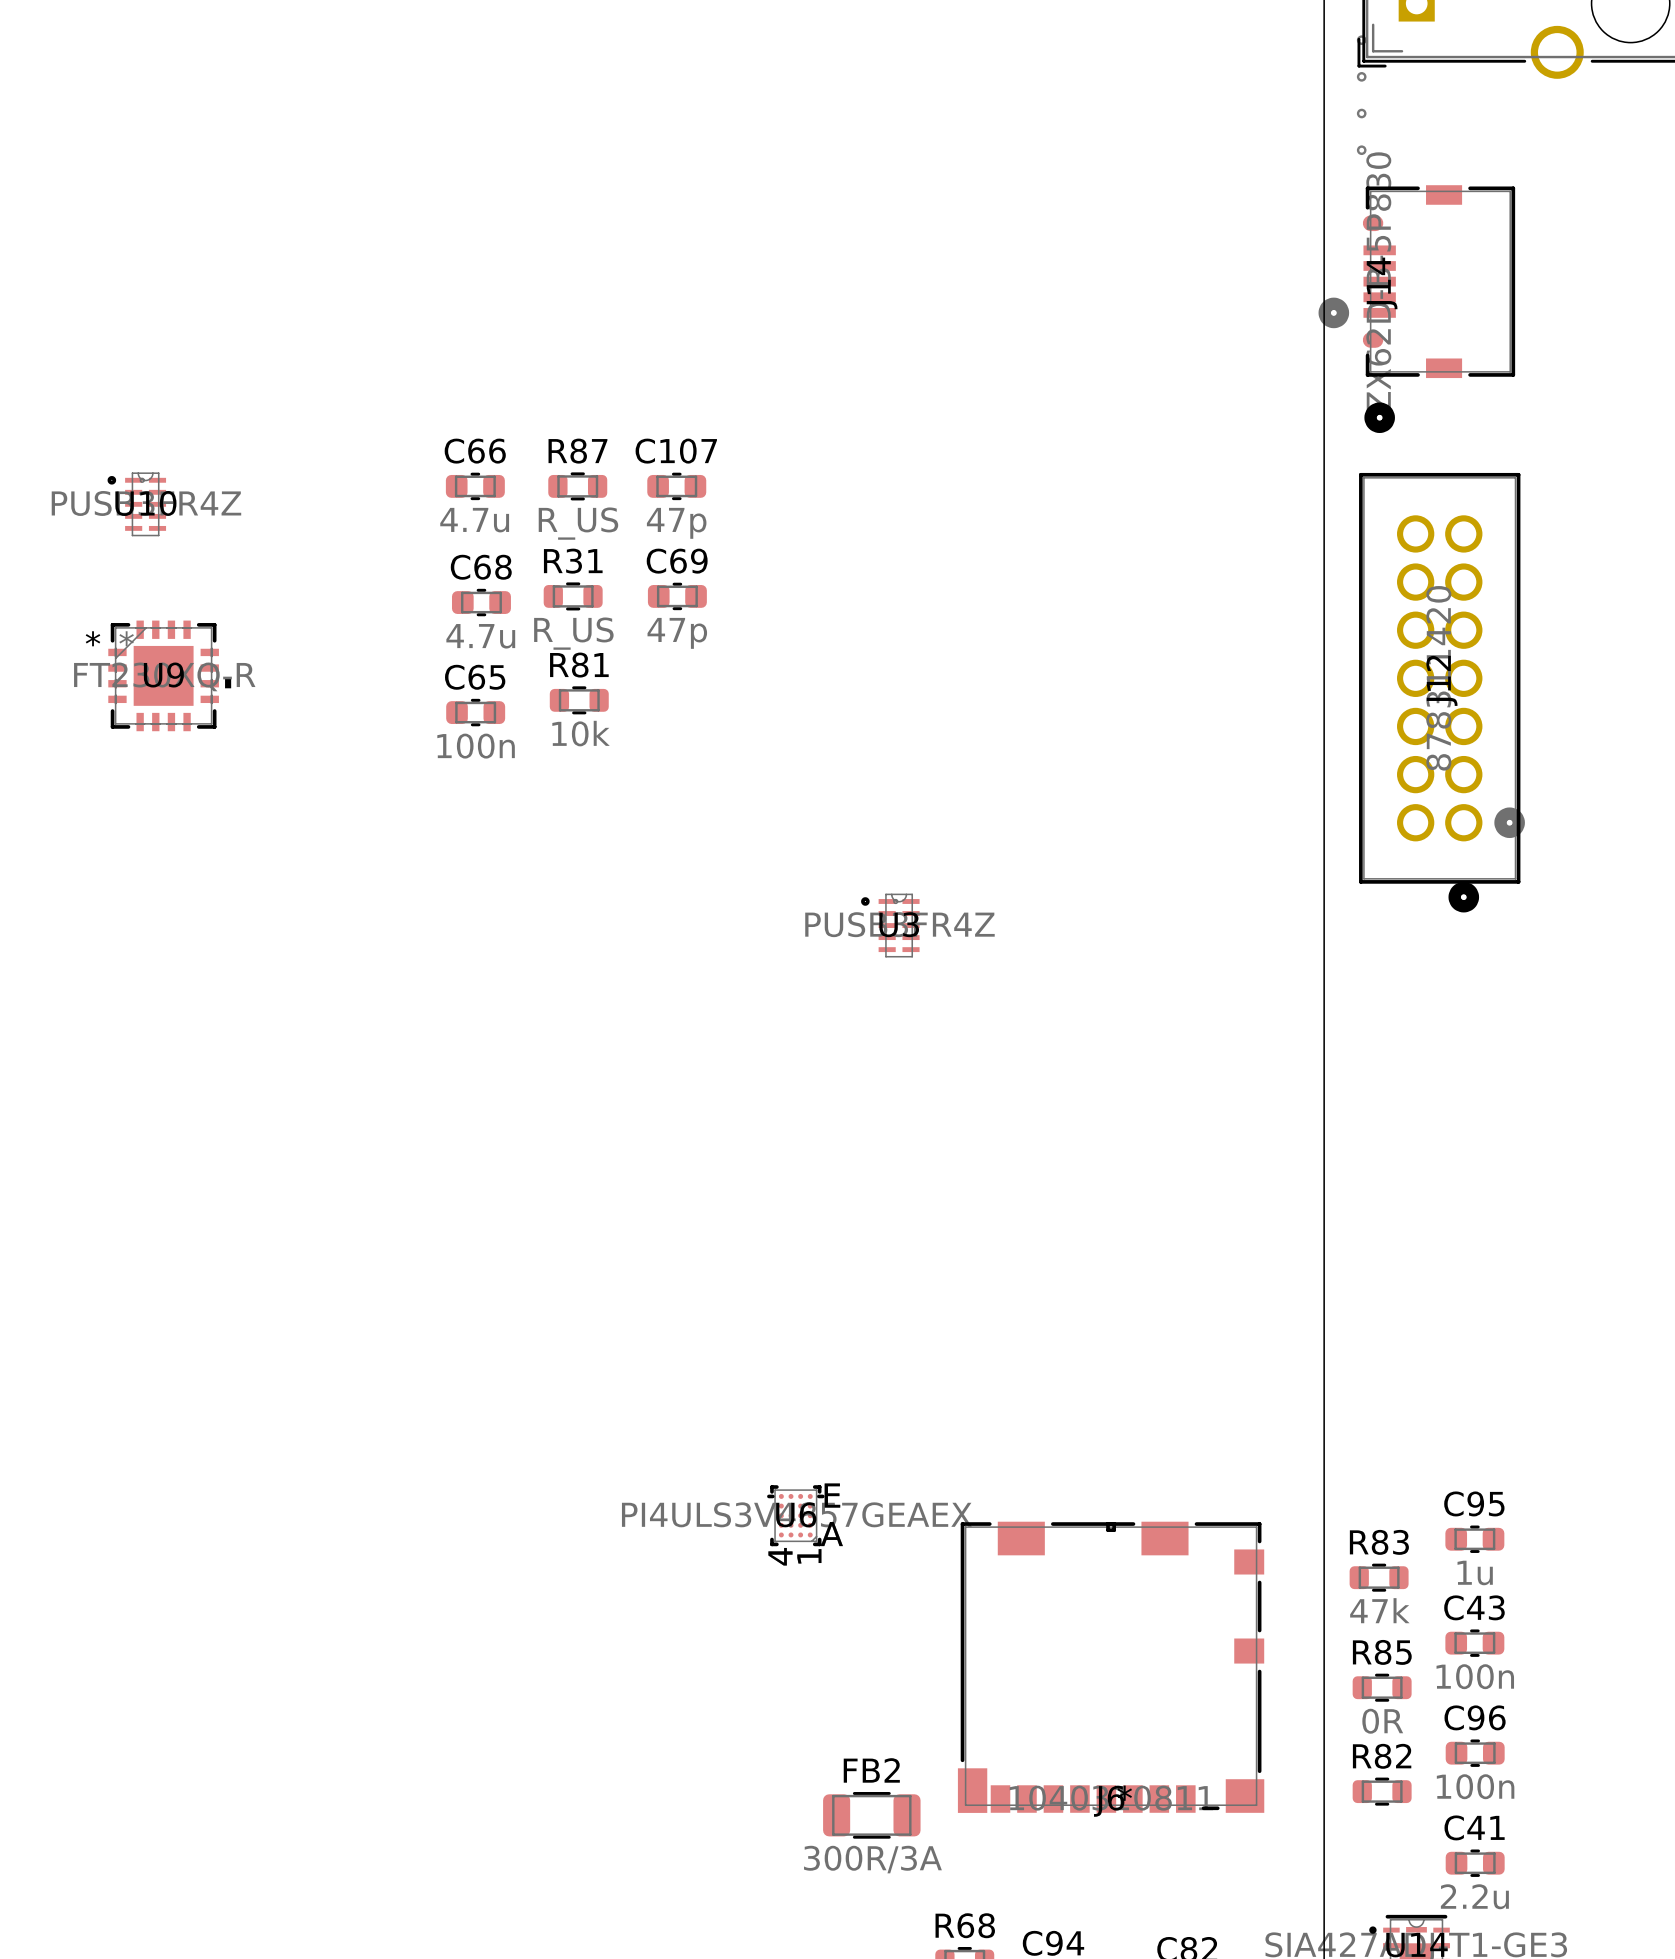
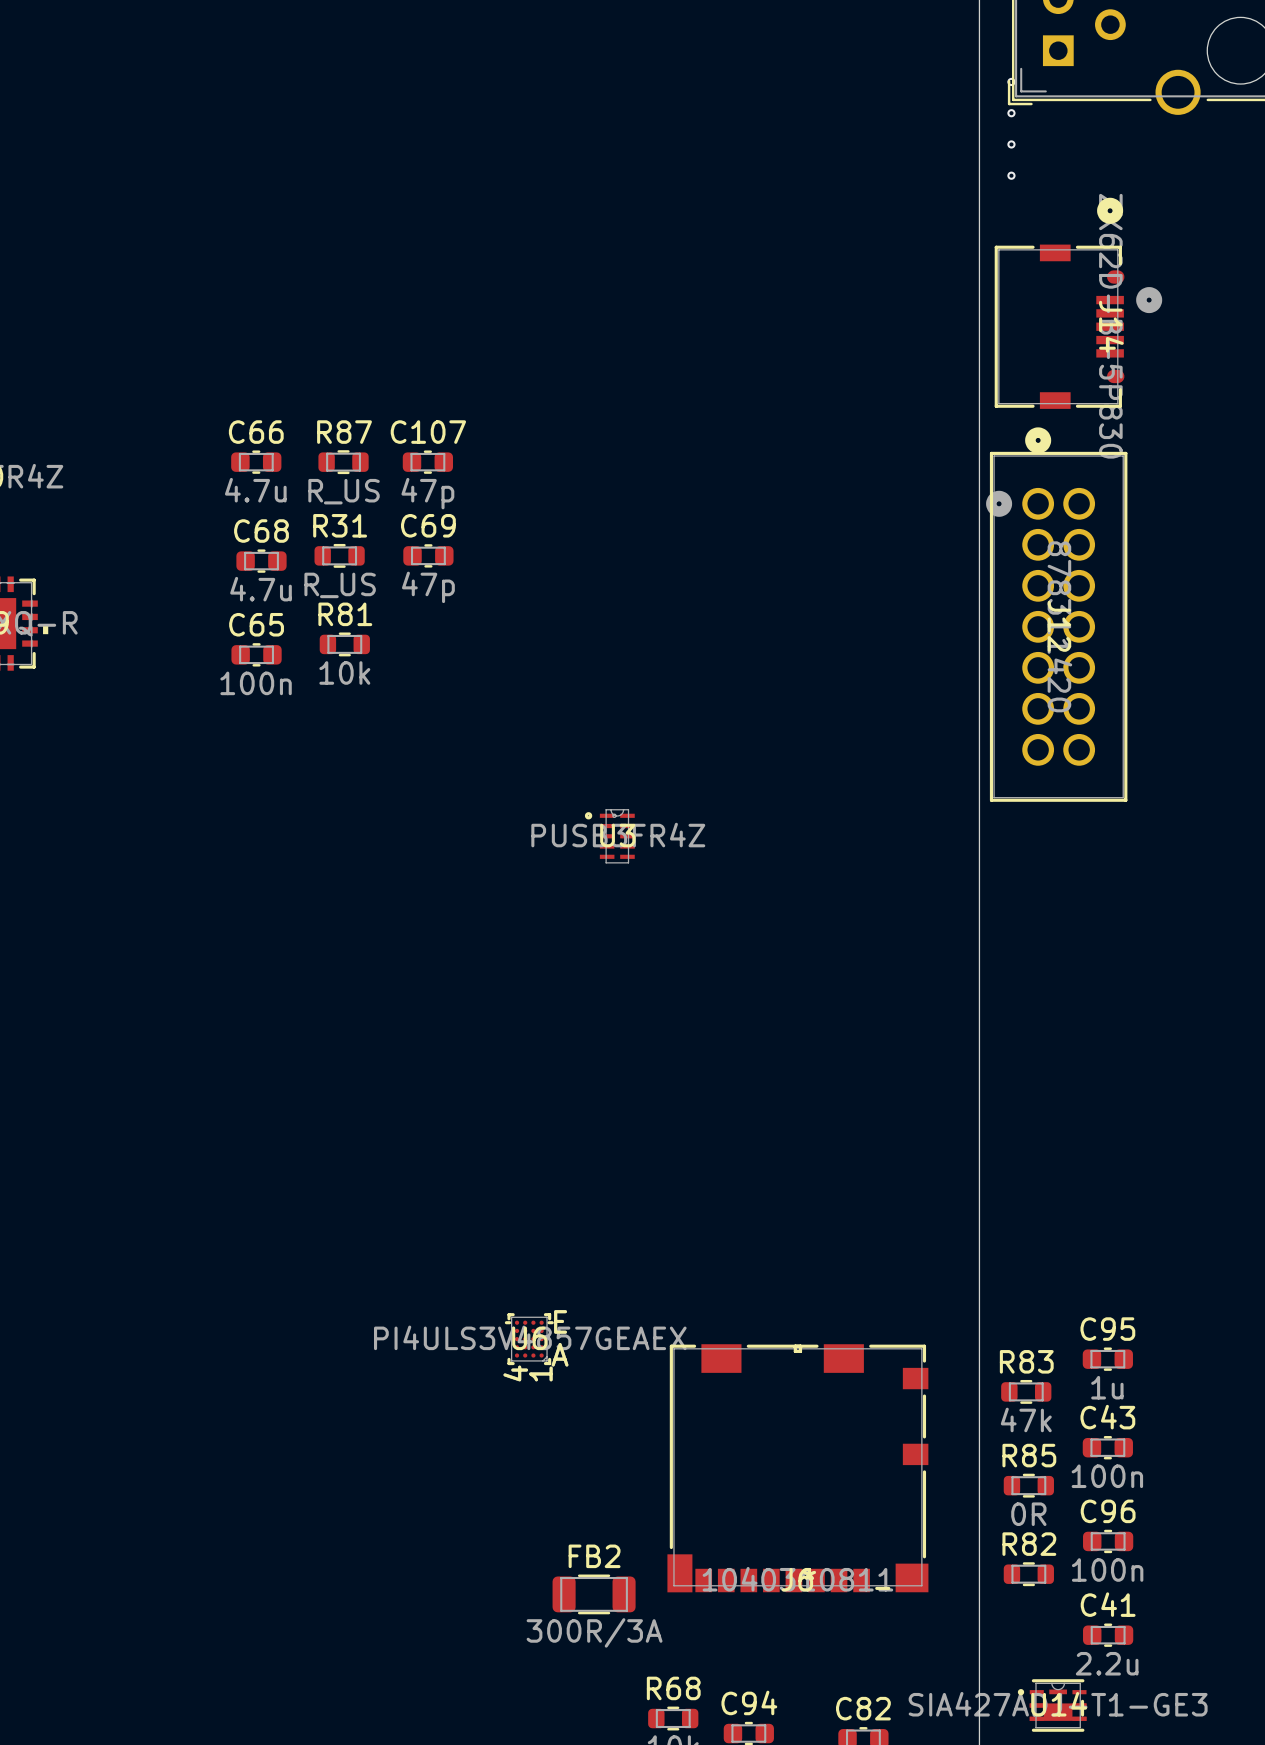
J14 rotation: 0° (1416, 309) -> 180° (1078, 303)
J12 rotation: 0° (1441, 692) -> 180° (1056, 614)

